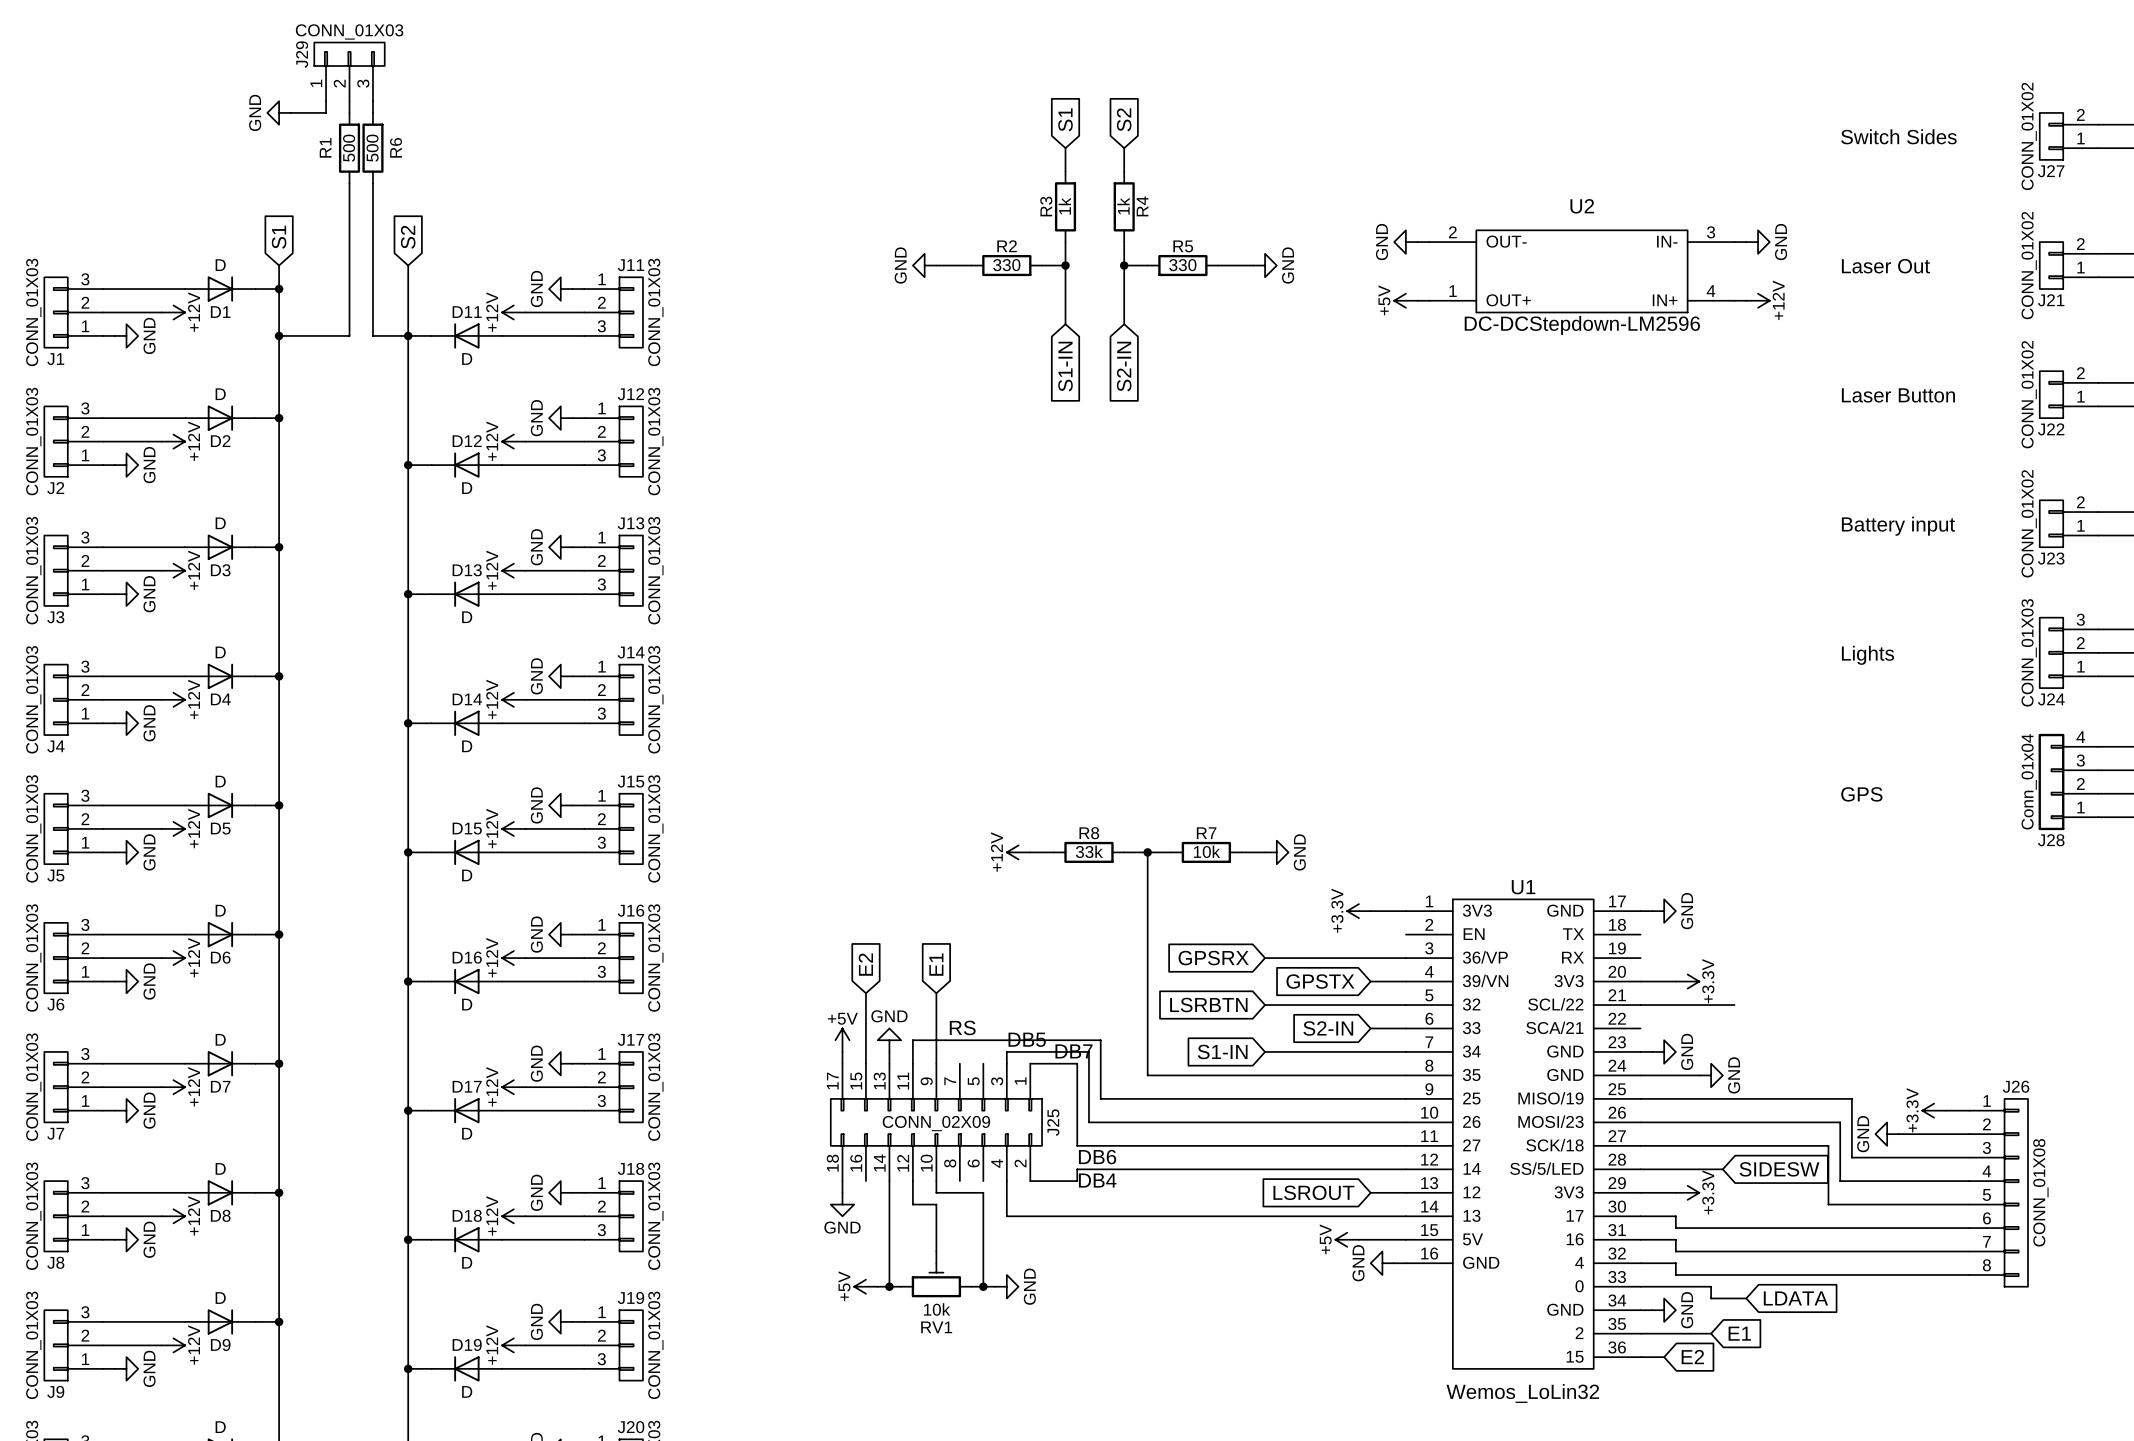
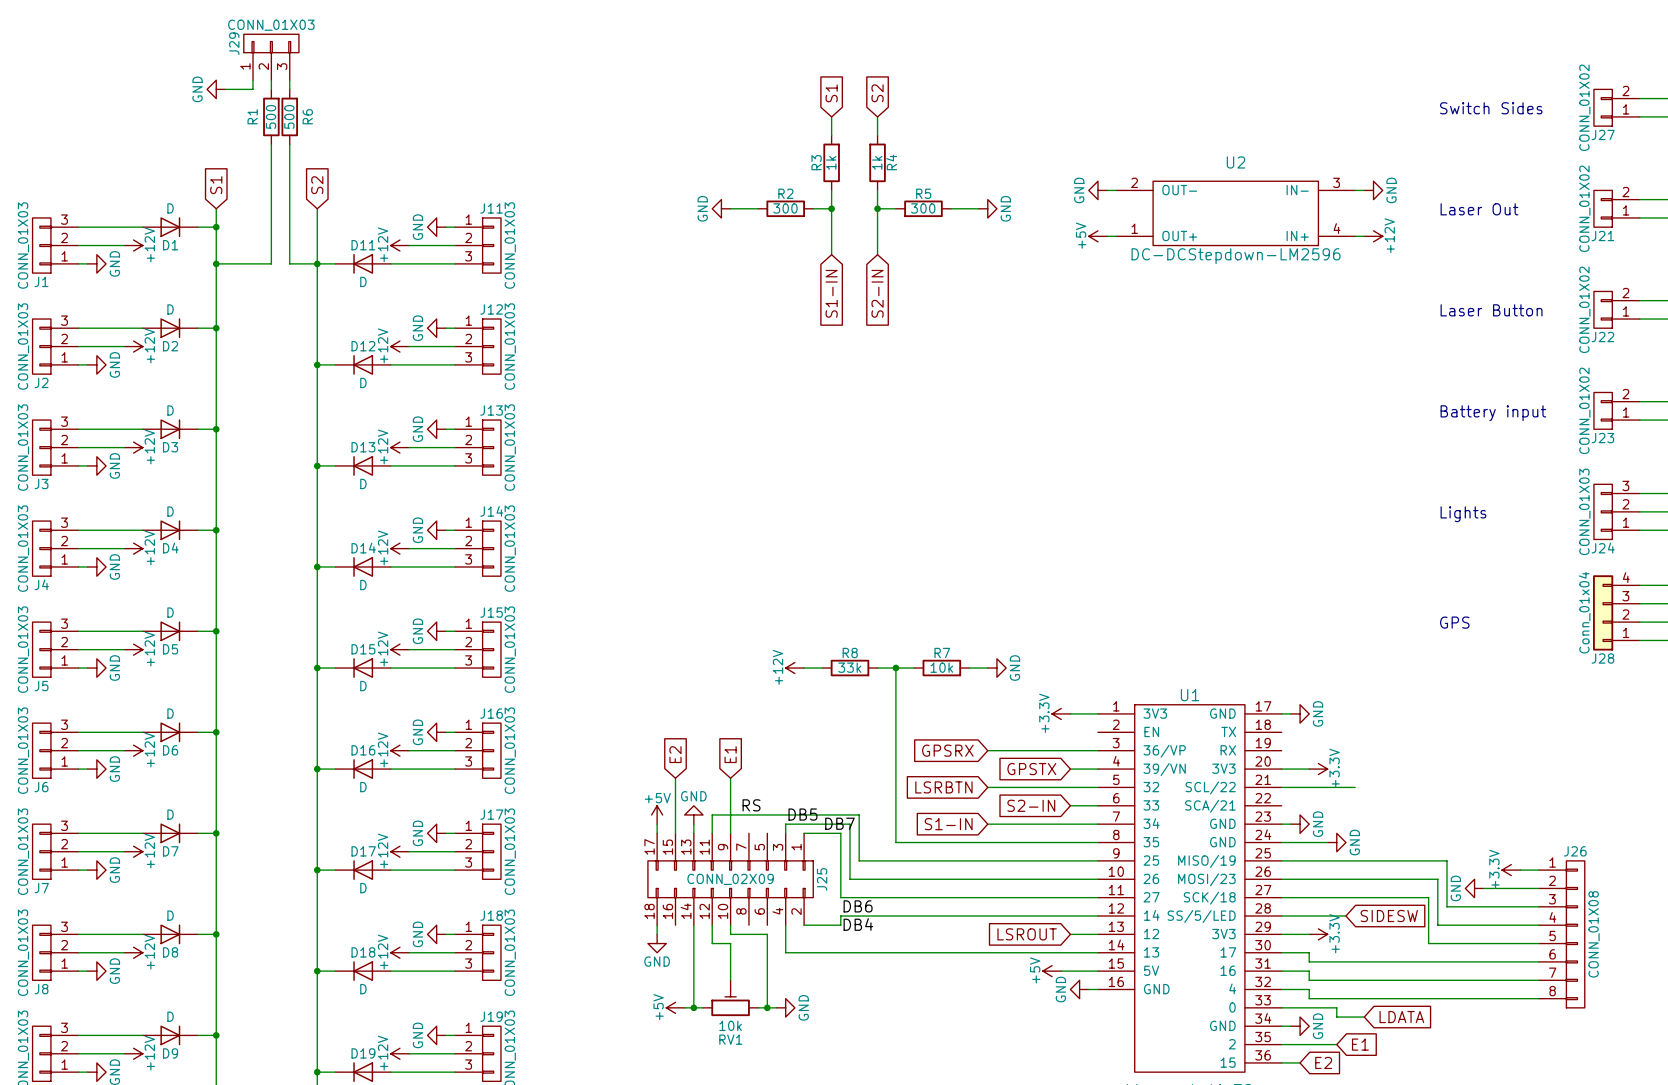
R2 value: 330 (1006, 265) -> 300 (785, 208)
R5 value: 330 (1182, 265) -> 300 (923, 208)

